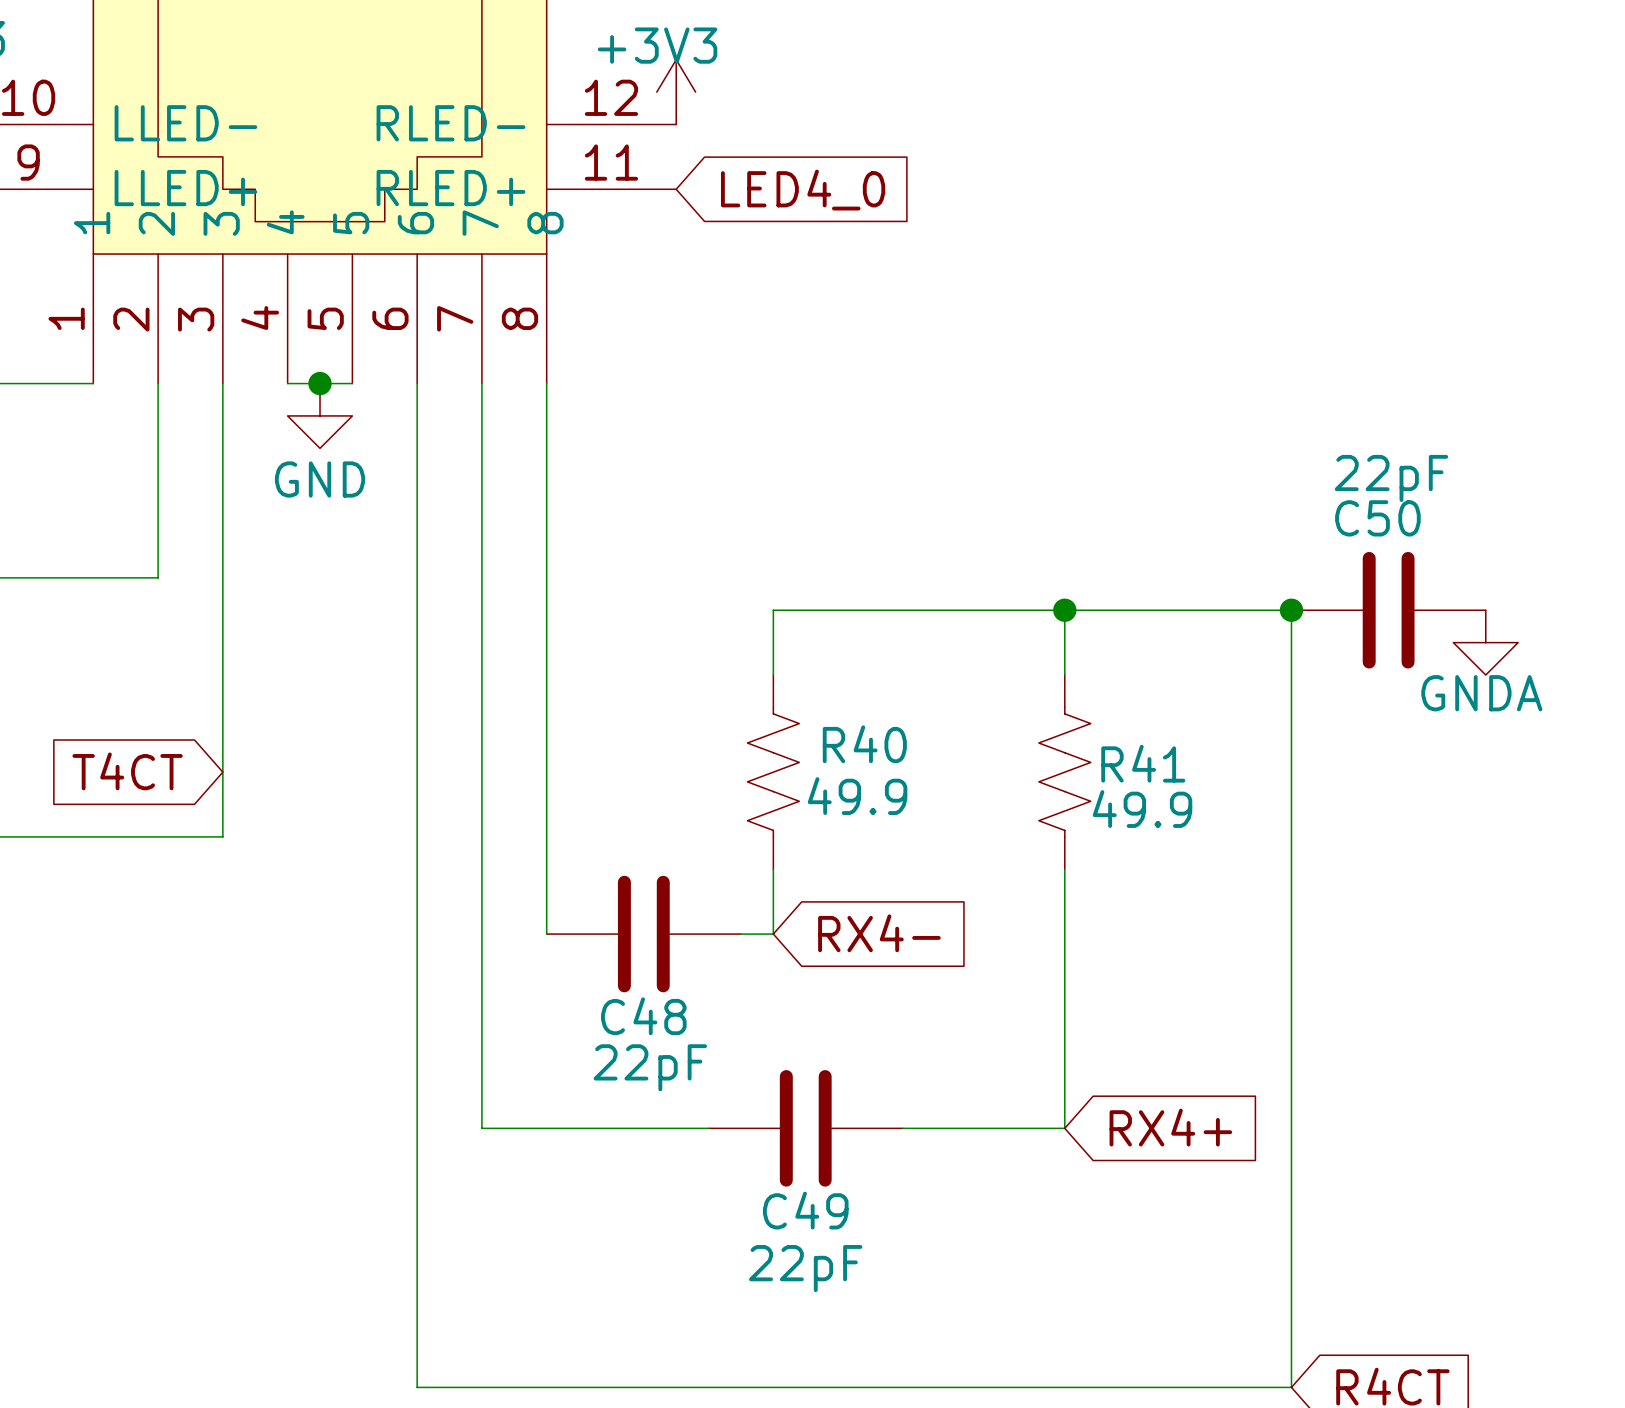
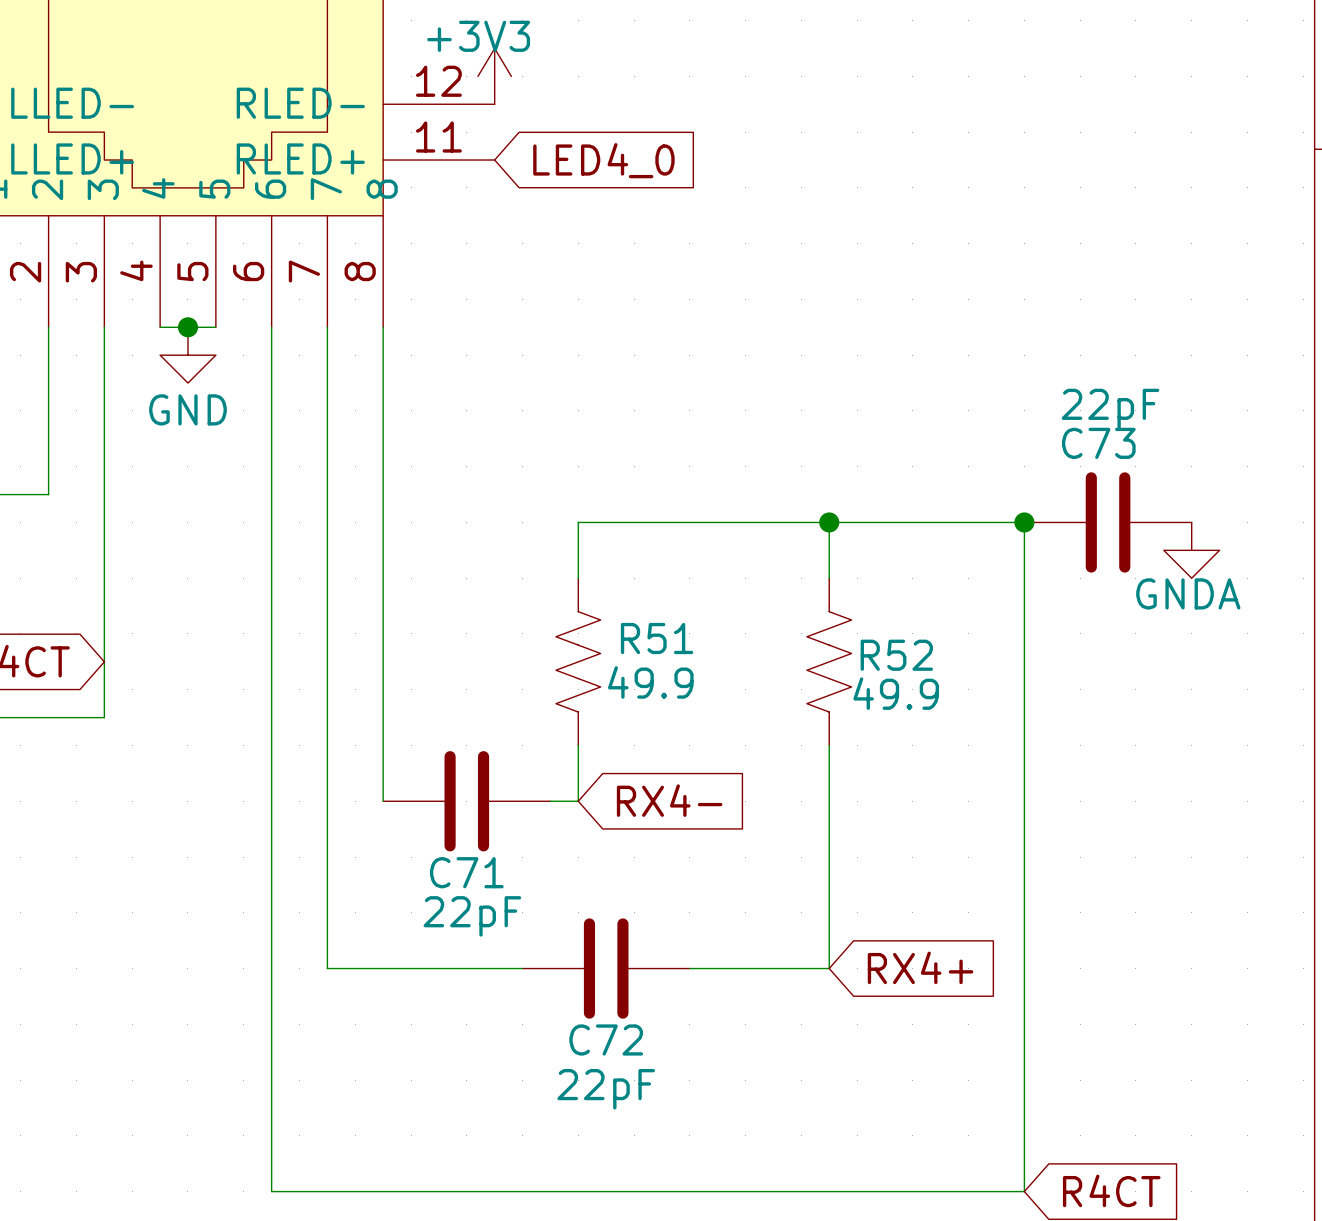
C50 name: C50 (1377, 518) -> C73 (1098, 443)
R40 name: R40 (864, 744) -> R51 (657, 638)
R41 name: R41 (1143, 763) -> R52 (896, 655)
C48 name: C48 (643, 1016) -> C71 (466, 872)
C49 name: C49 (805, 1210) -> C72 (606, 1039)

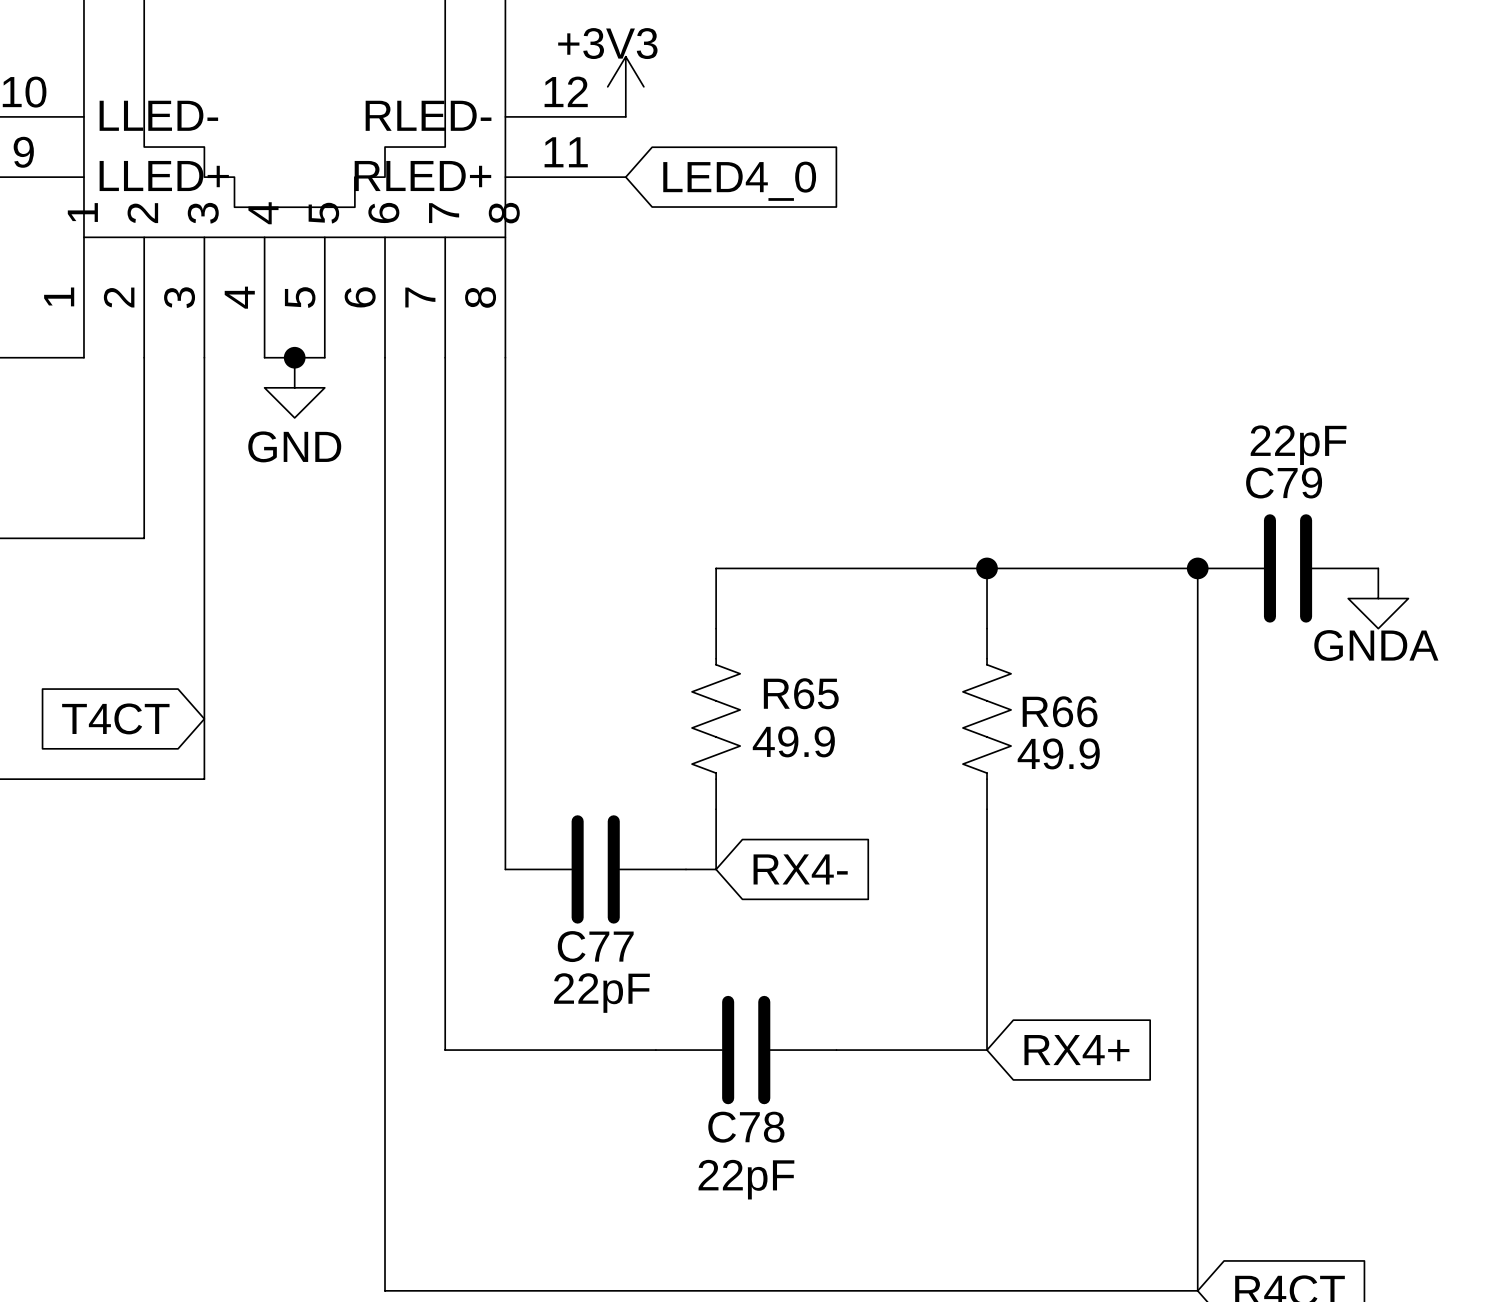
C73 name: C73 (1098, 443) -> C79 (1284, 483)
R51 name: R51 (657, 638) -> R65 (801, 693)
R52 name: R52 (896, 655) -> R66 (1060, 711)
C71 name: C71 (466, 872) -> C77 (595, 946)
C72 name: C72 (606, 1039) -> C78 (746, 1127)

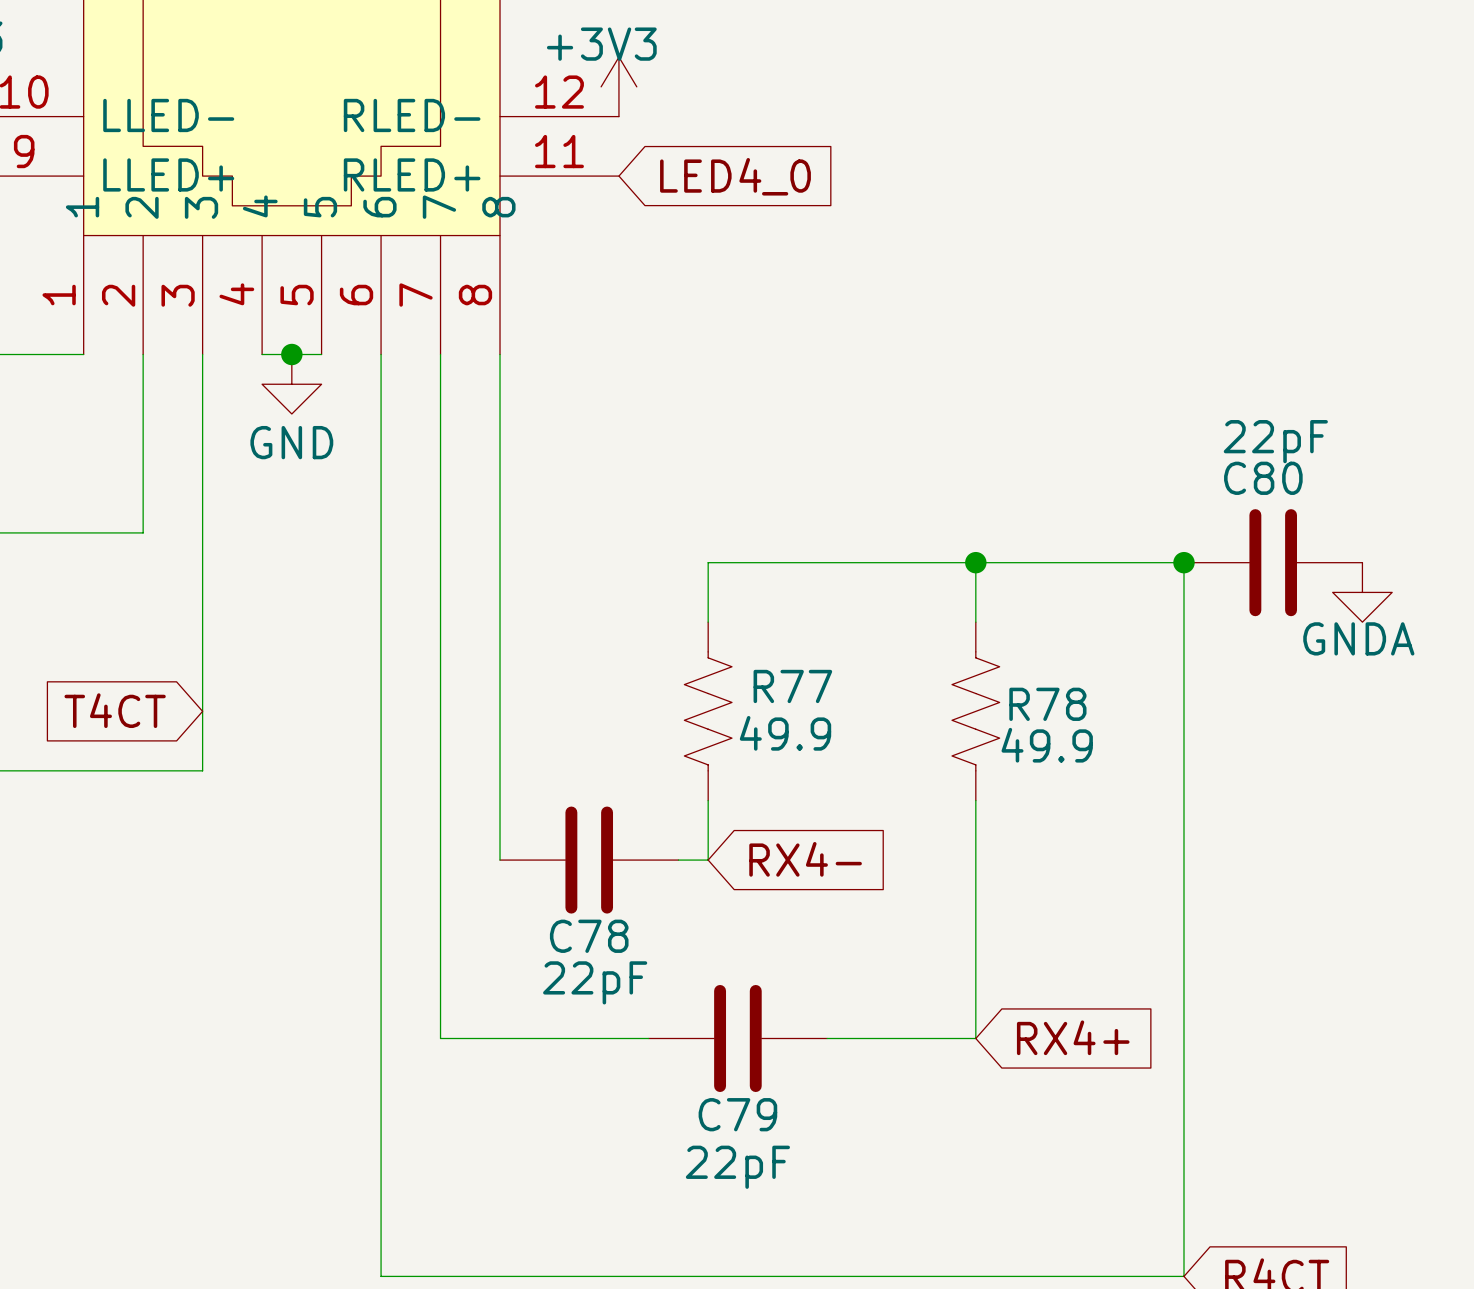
C79 name: C79 (1284, 483) -> C80 (1263, 478)
R65 name: R65 (801, 693) -> R77 (792, 686)
R66 name: R66 (1060, 711) -> R78 (1047, 704)
C77 name: C77 (595, 946) -> C78 (589, 936)
C78 name: C78 (746, 1127) -> C79 (737, 1114)

